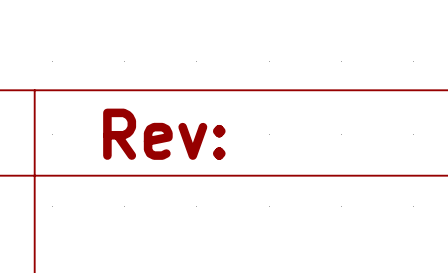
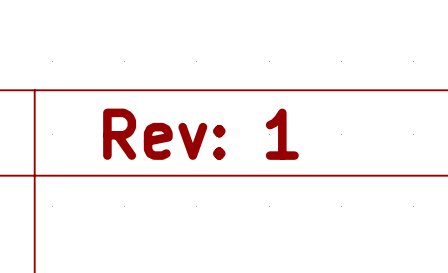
title block: Rev: (164, 134) -> Rev: 1 (200, 134)

